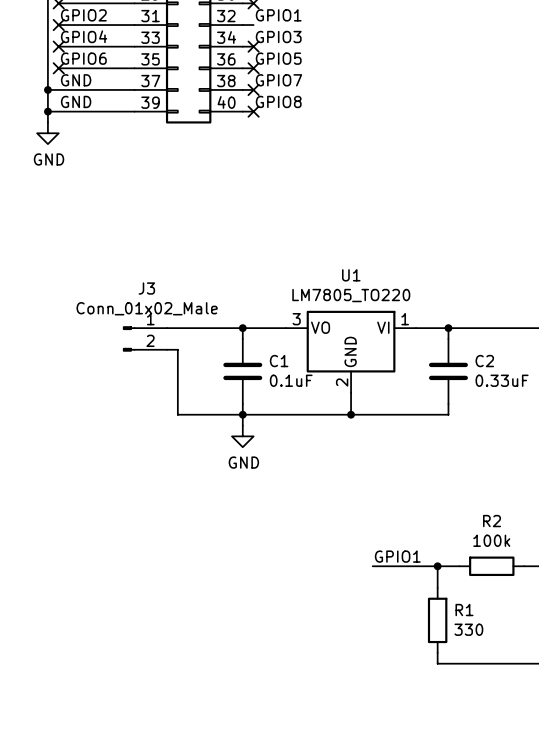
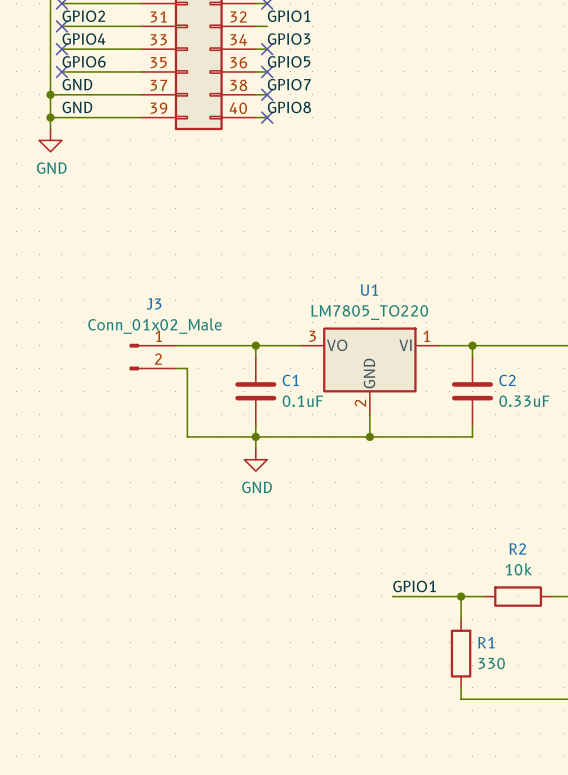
R2 value: 100k (491, 540) -> 10k (518, 569)

